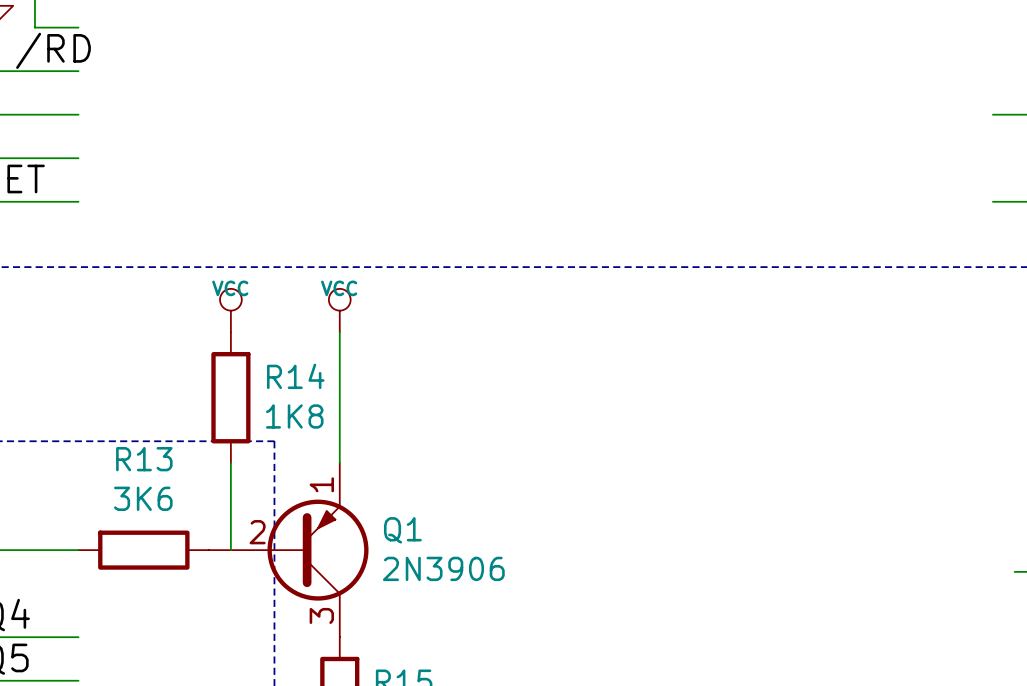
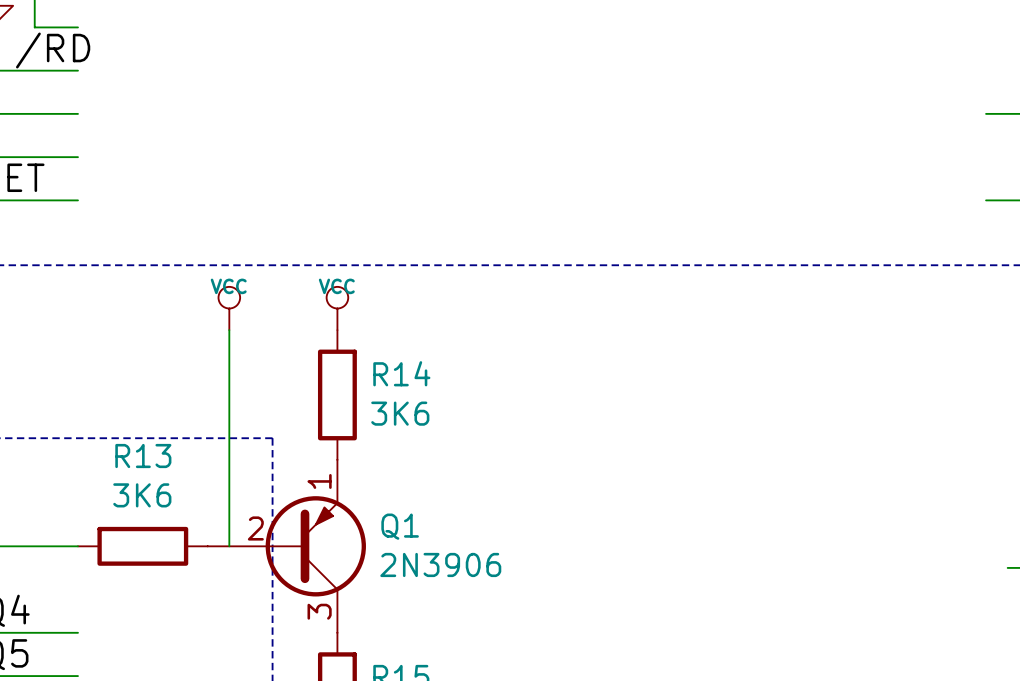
wire: (339, 332) (339, 463) -> (229, 330) (229, 459)
R14 position: (230, 397) -> (337, 394)
R14 value: 1K8 (294, 416) -> 3K6 (400, 413)

